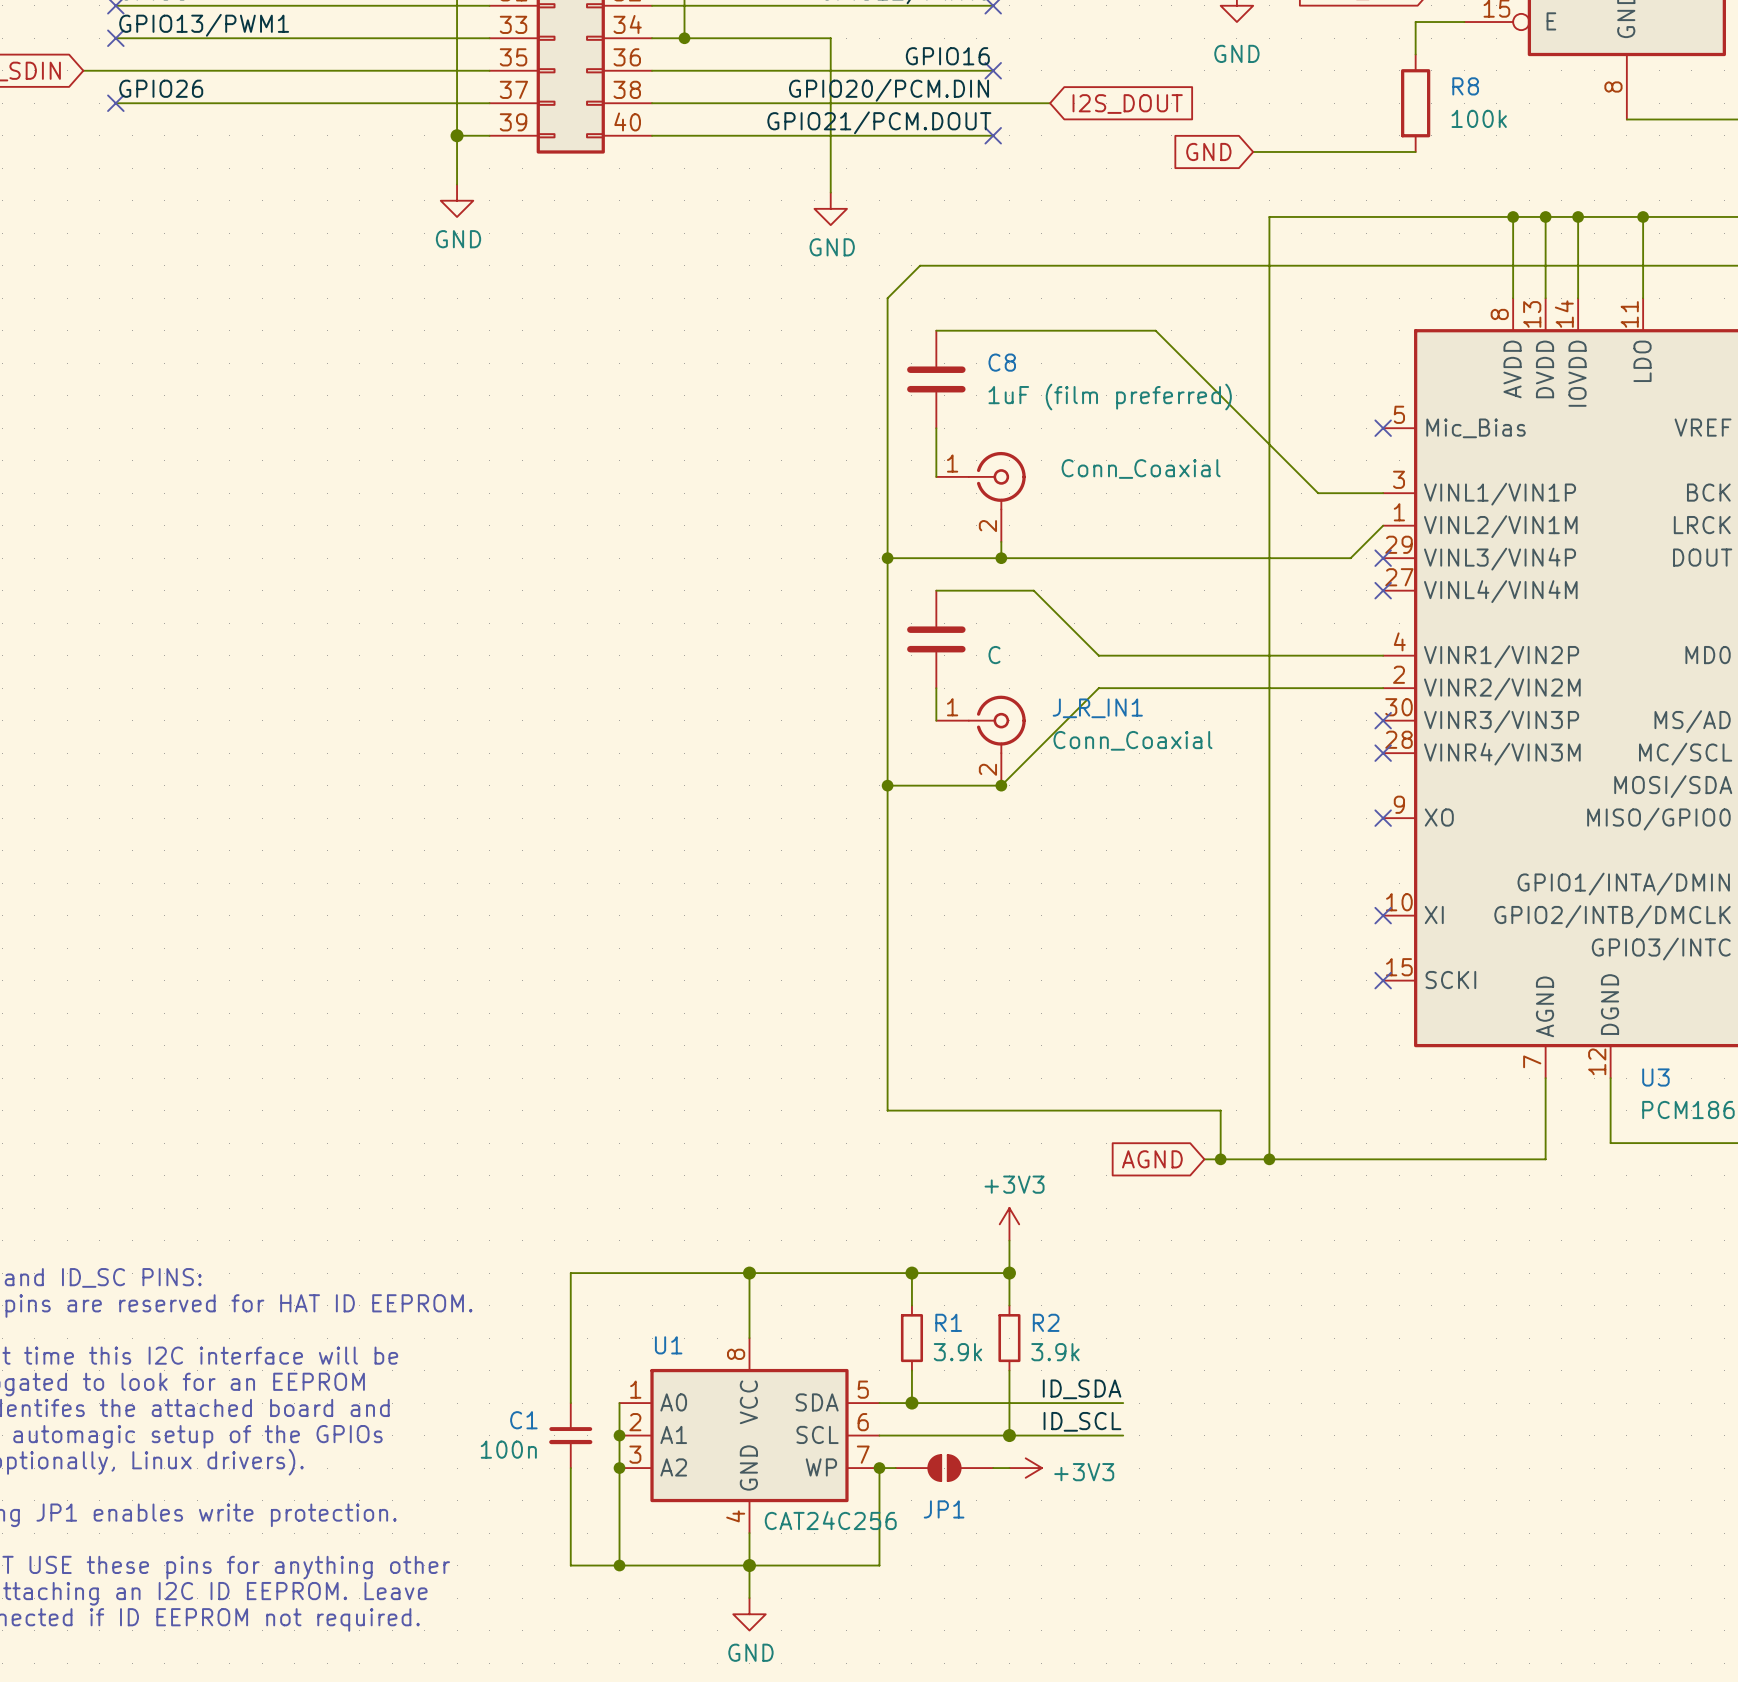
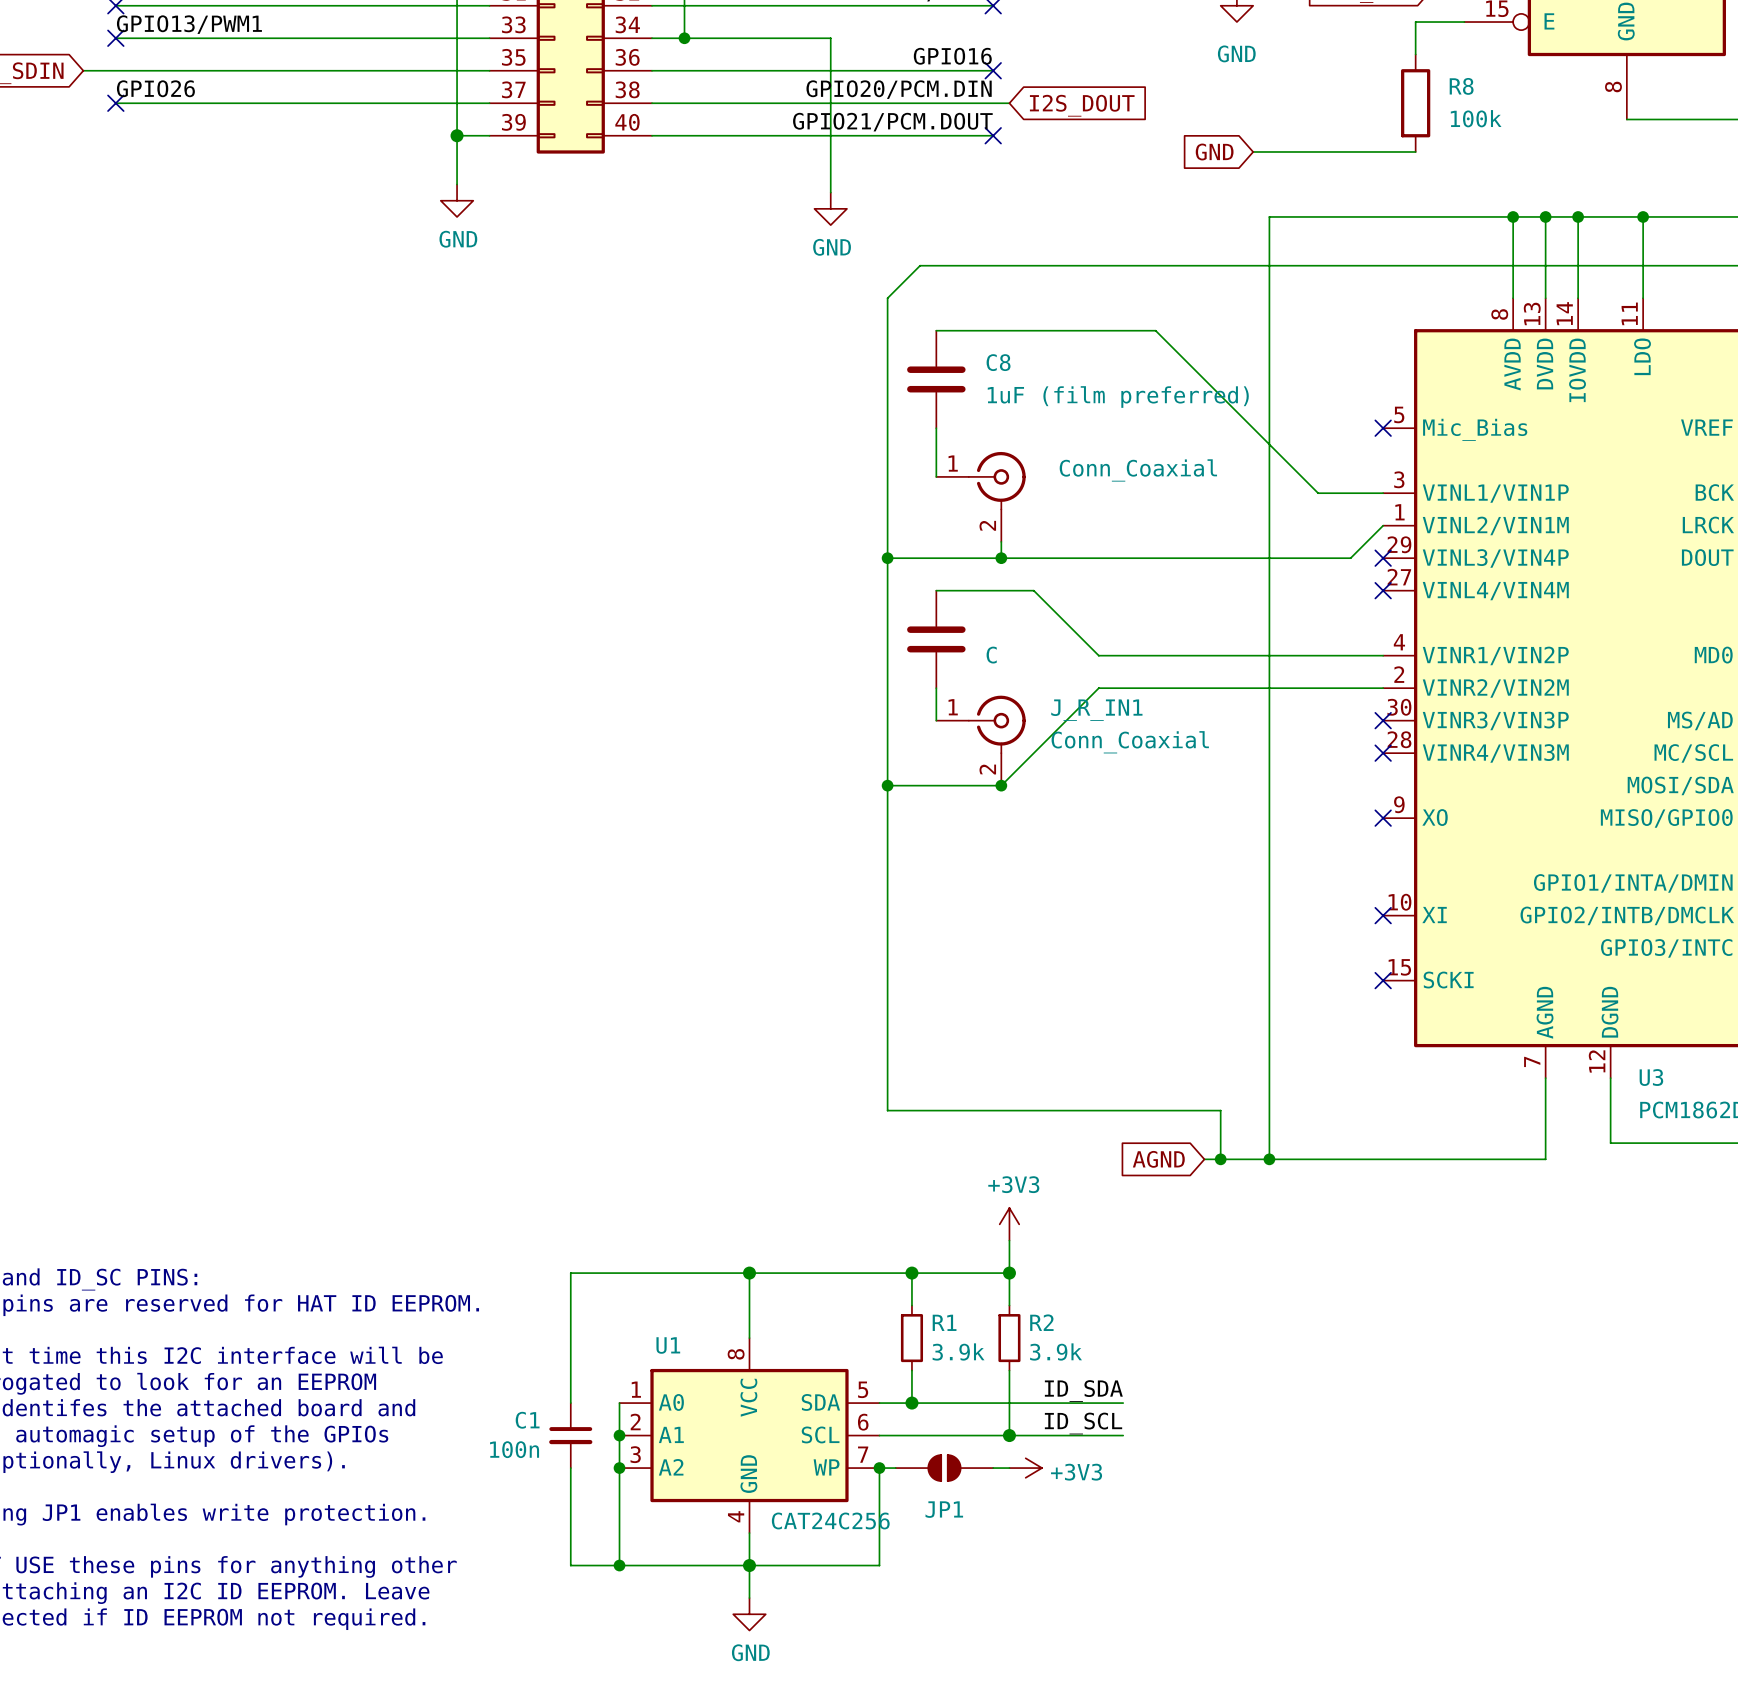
wire: (1009, 103) (1050, 103) -> none
global label position: I2S_DOUT (1127, 104) -> I2S_DOUT (1082, 105)

